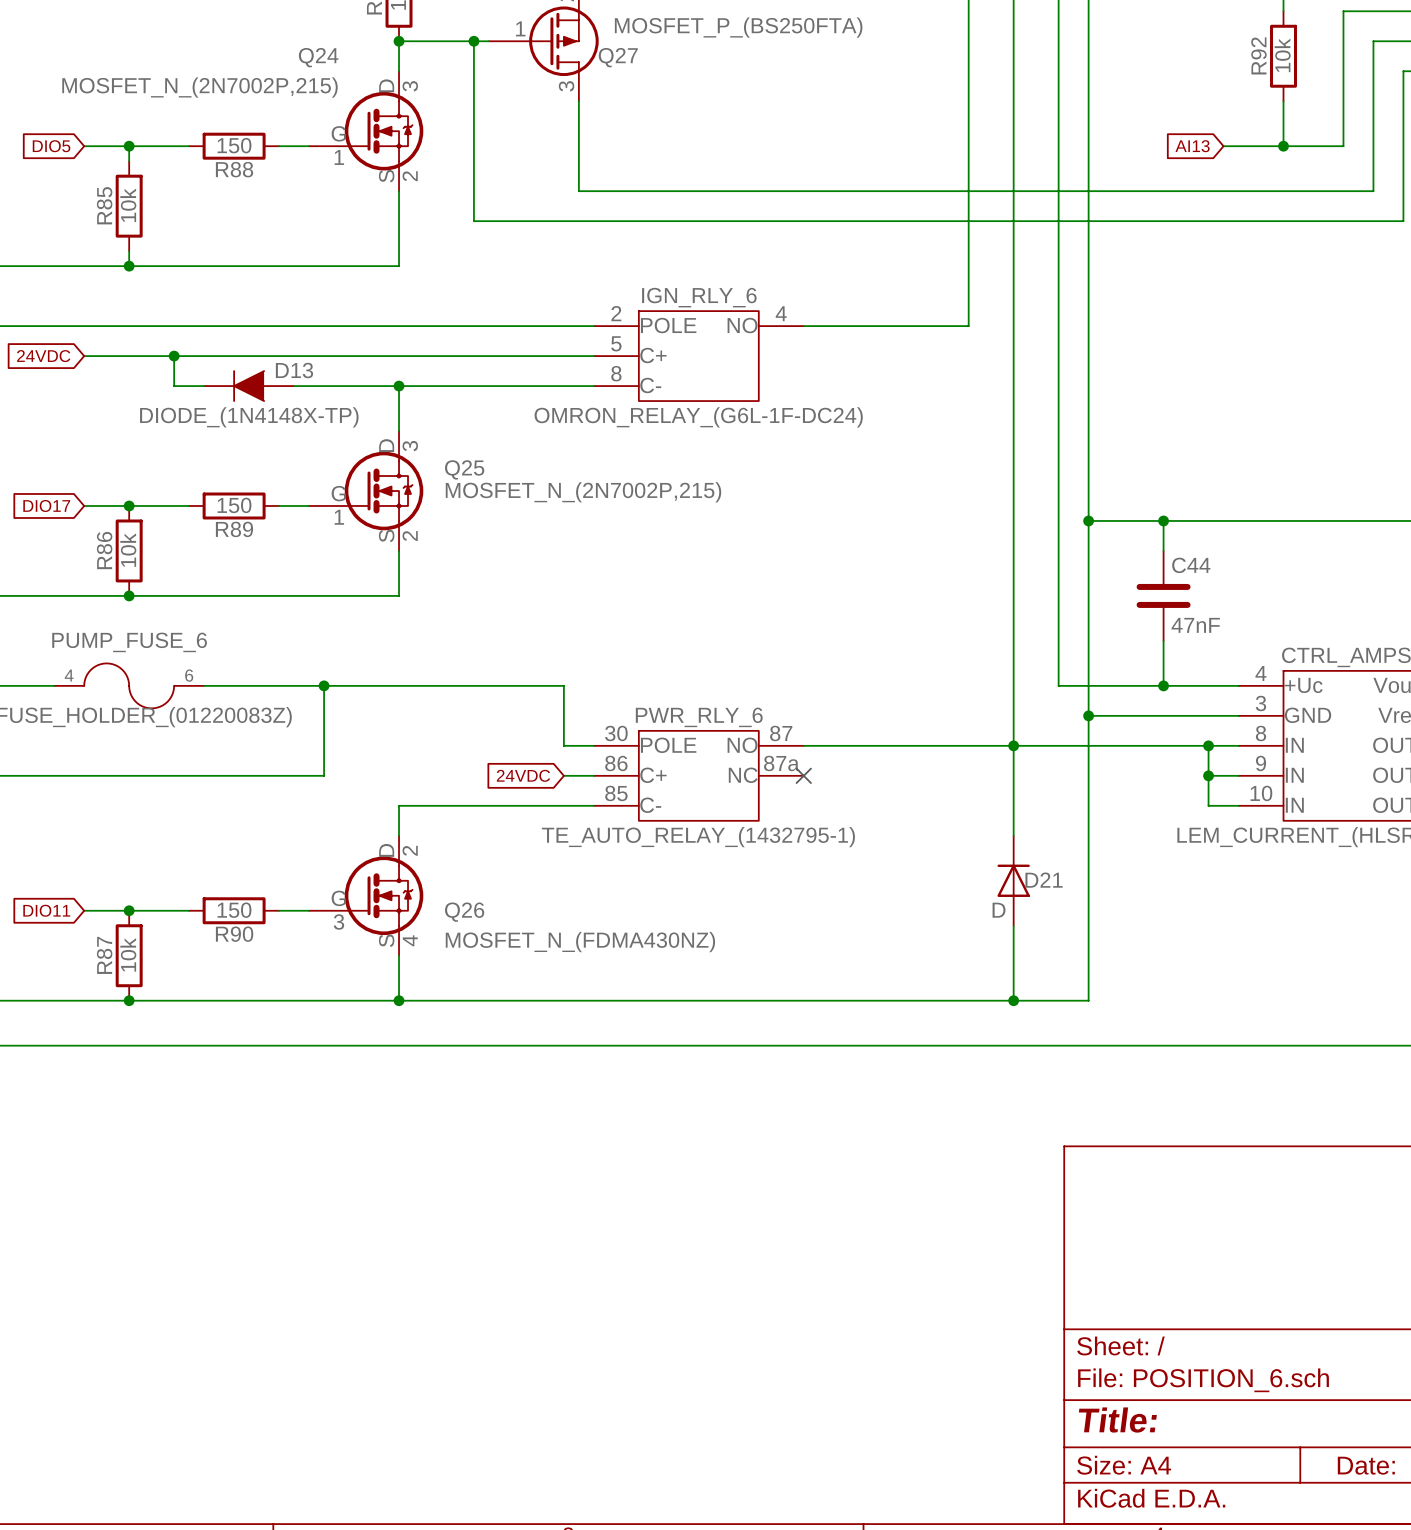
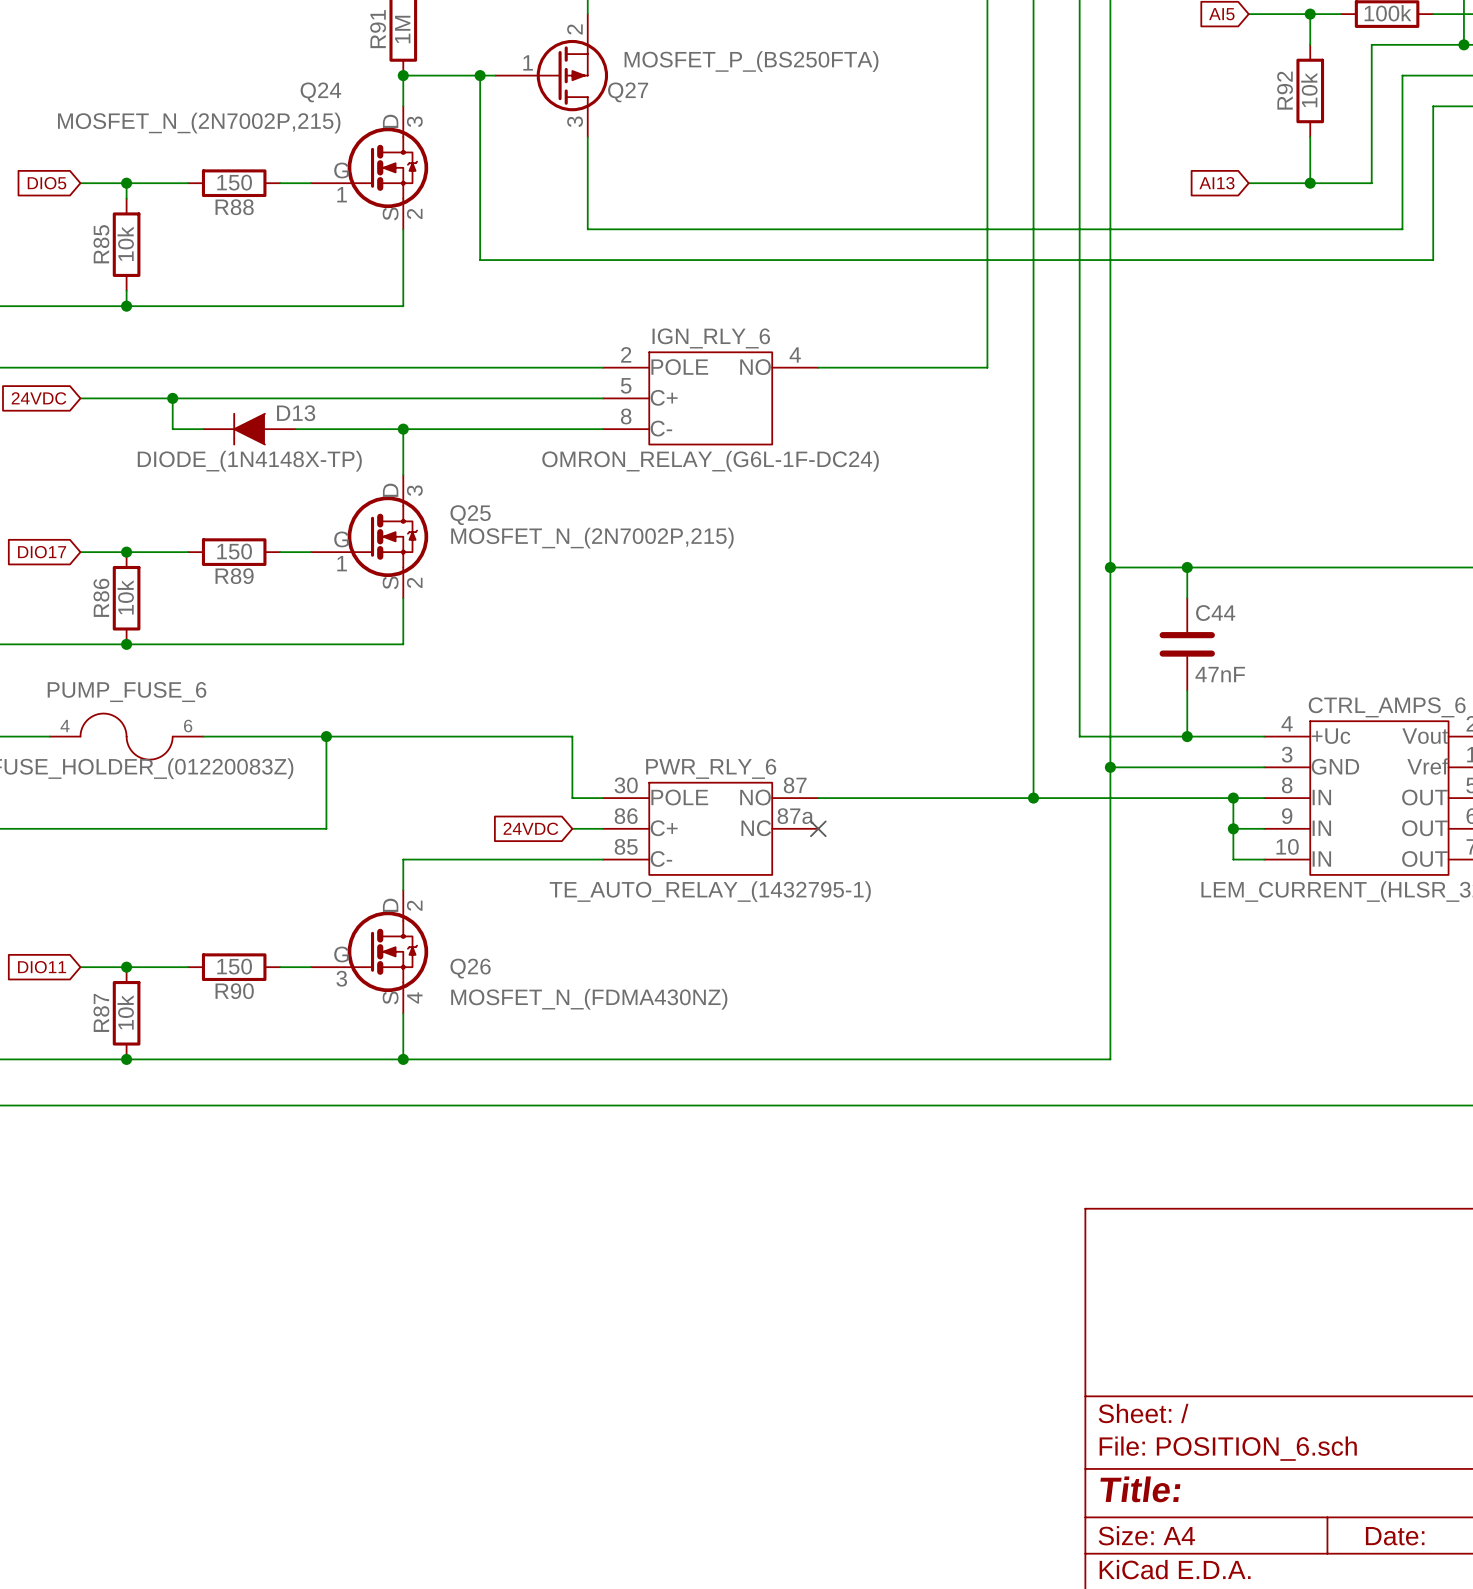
wire: (1013, 745) (1013, 835) -> none
D21: D (1013, 880) -> none
wire: (1013, 925) (1013, 1000) -> none
junction: (1013, 1000) -> none

